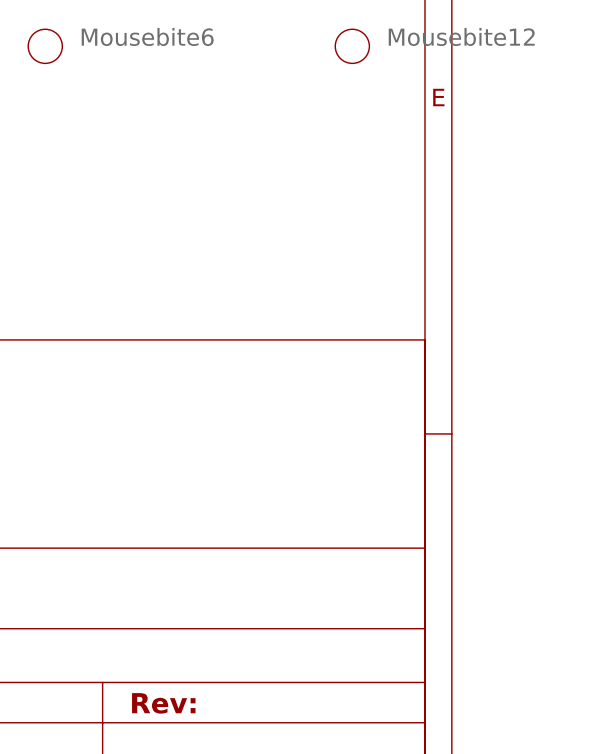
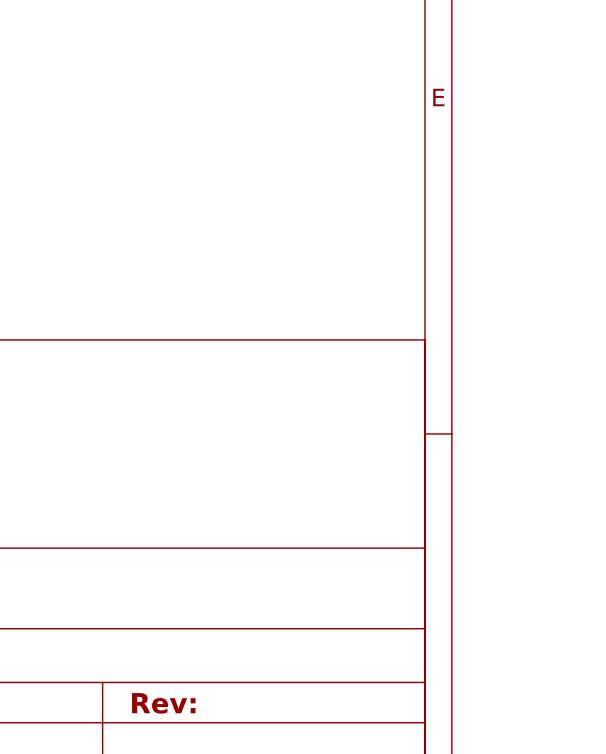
Mousebite6: (45, 46) -> none
Mousebite12: (352, 46) -> none

